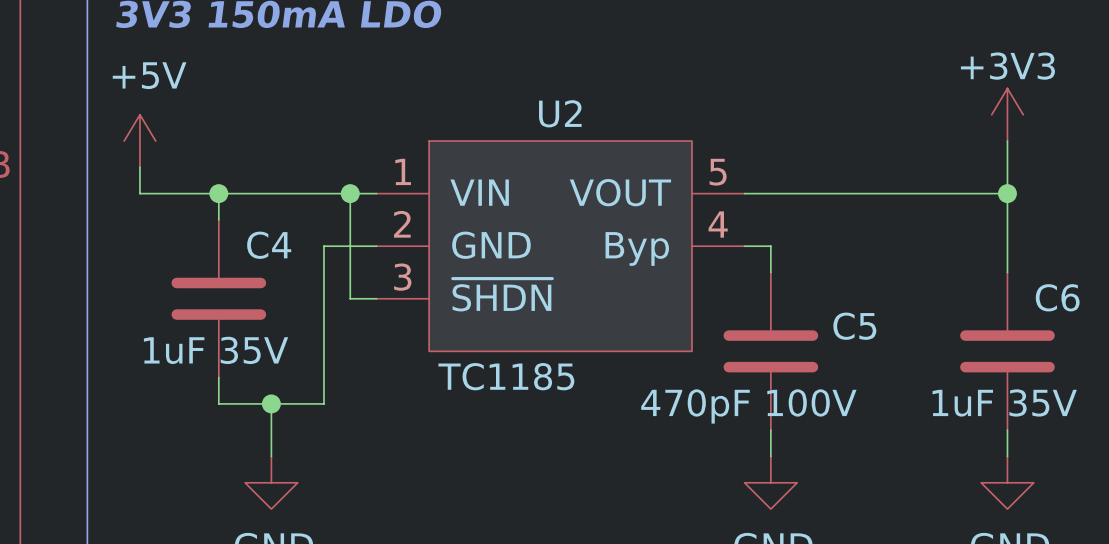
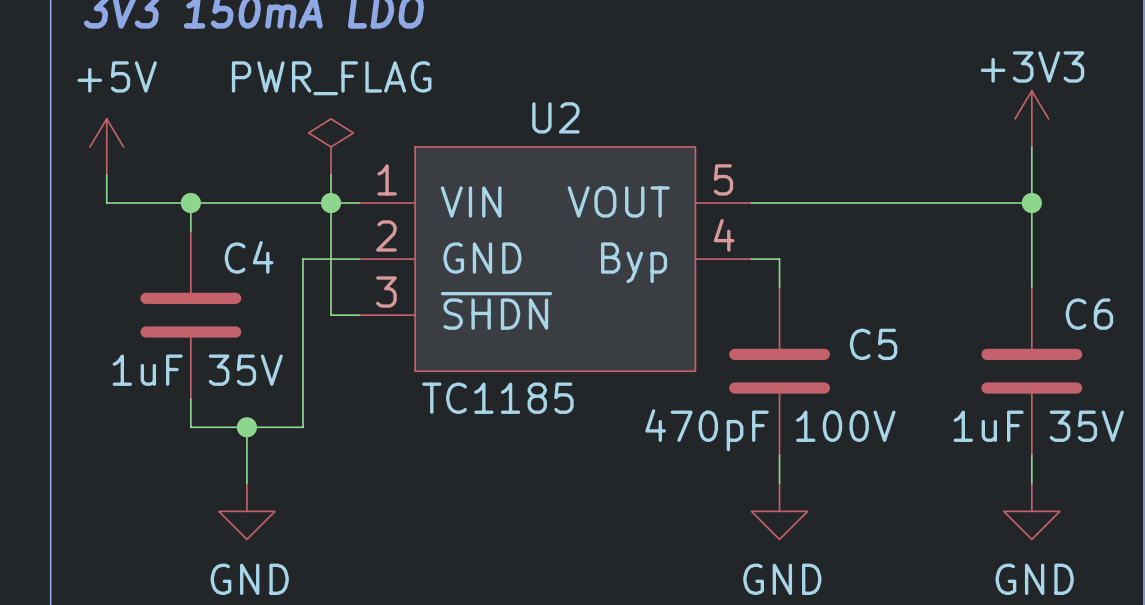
power symbol: none -> PWR_FLAG (331, 146)
wire: none -> (331, 174) (331, 203)

